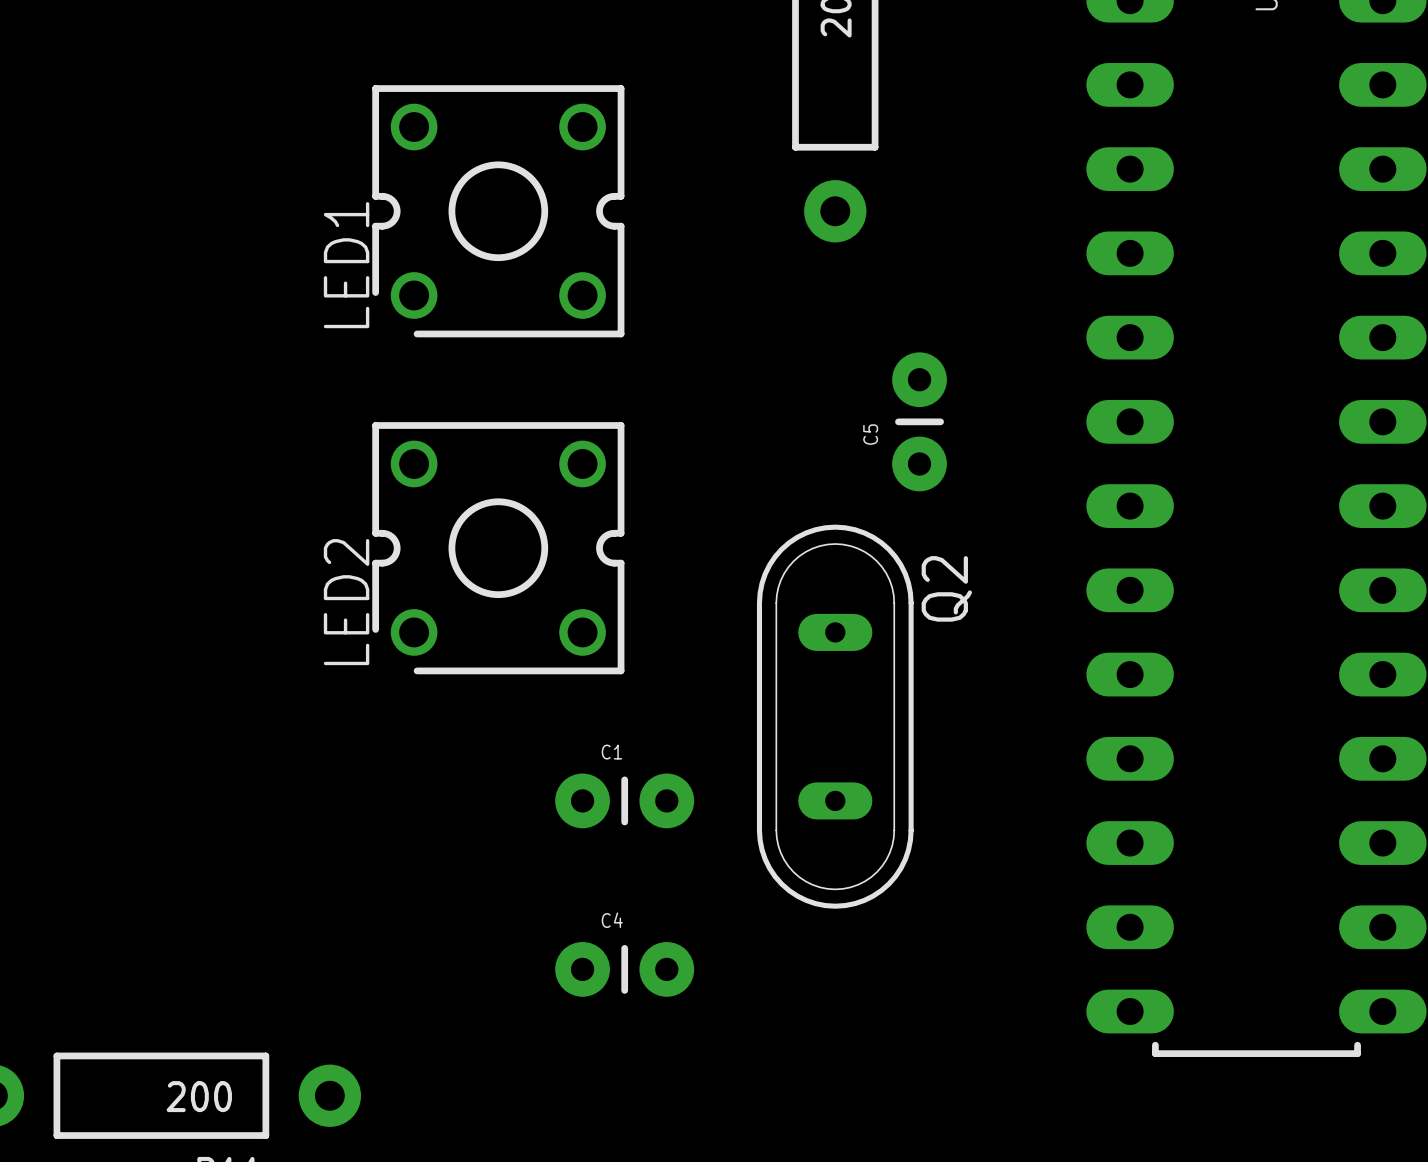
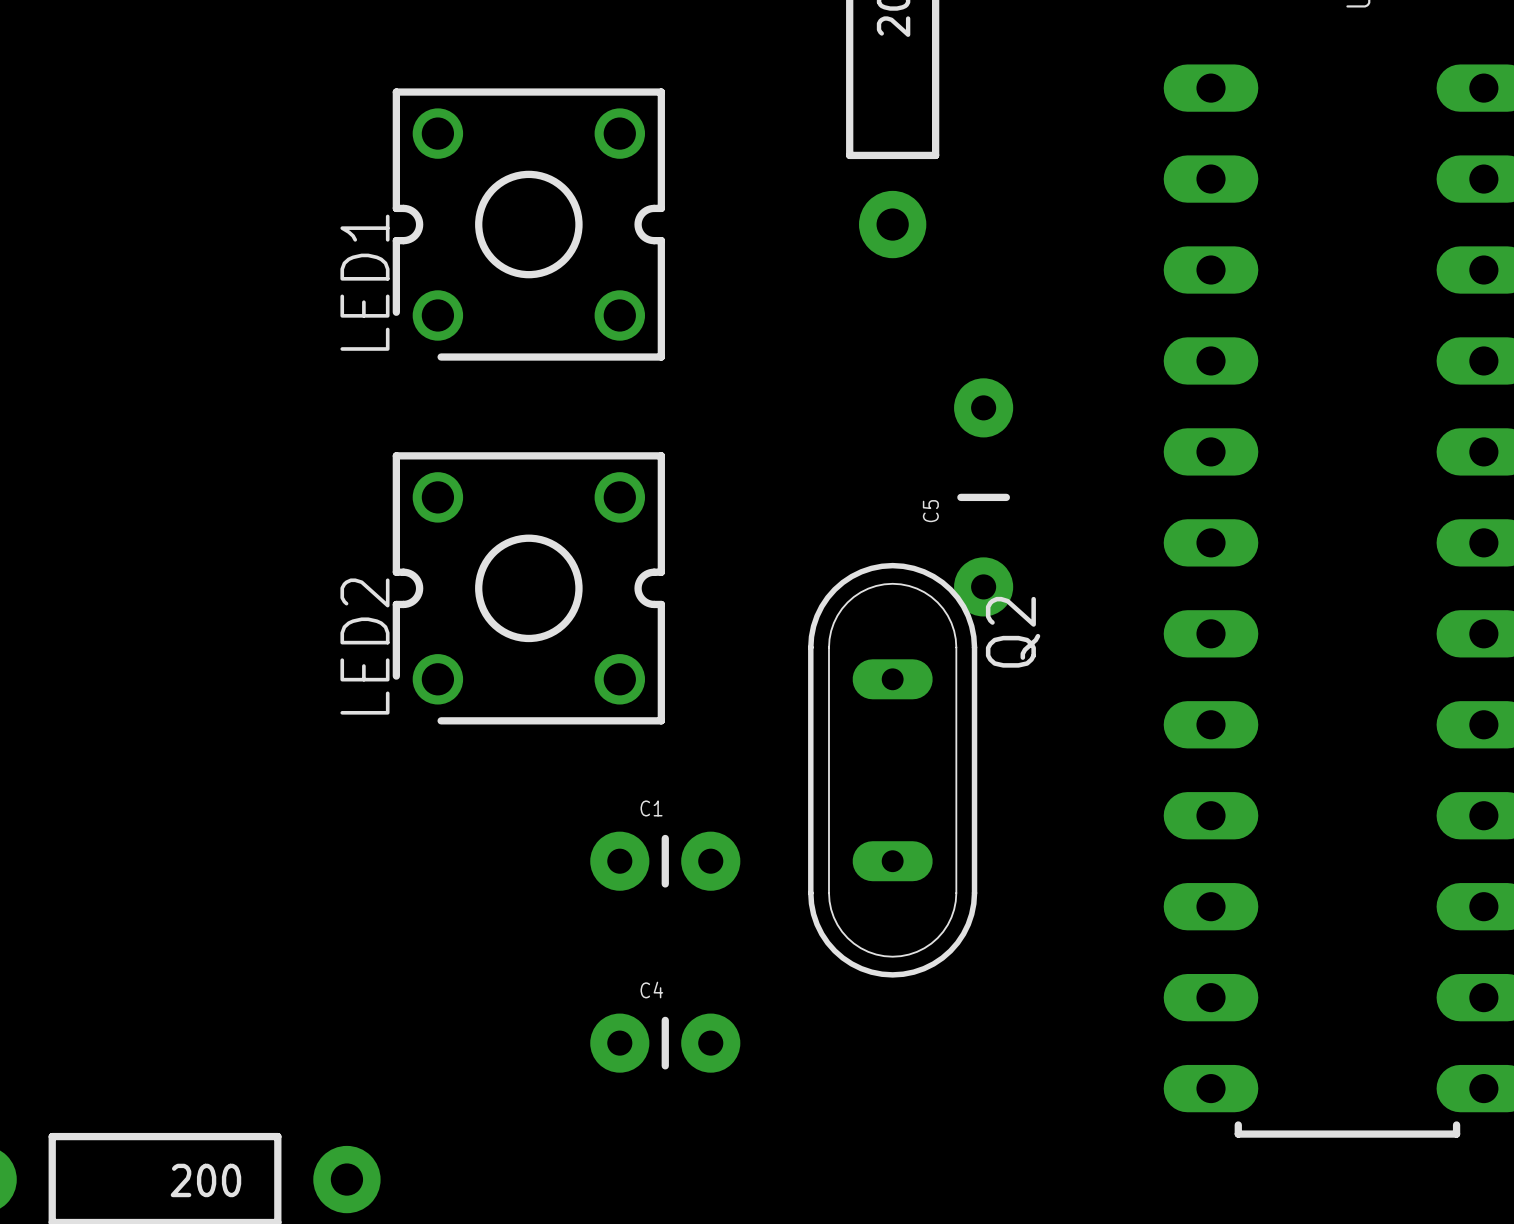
C5 footprint: [892, 352, 947, 492] -> [954, 378, 1014, 617]

